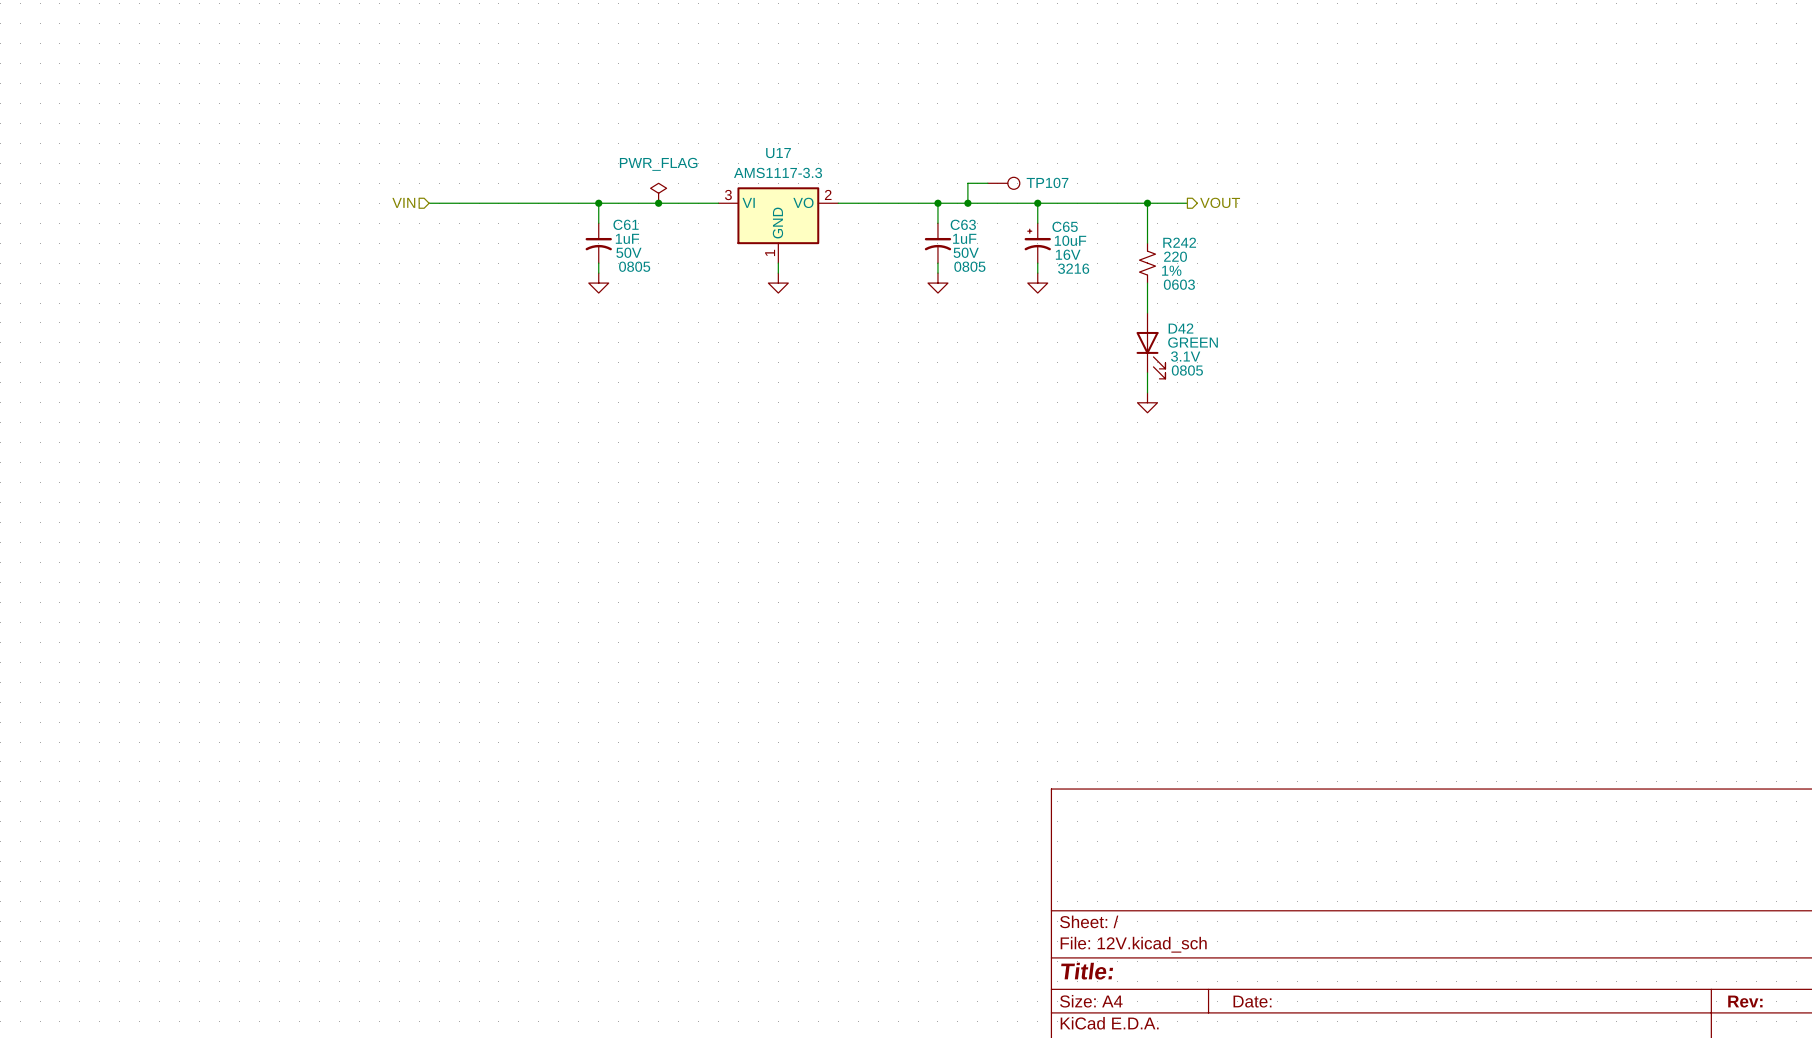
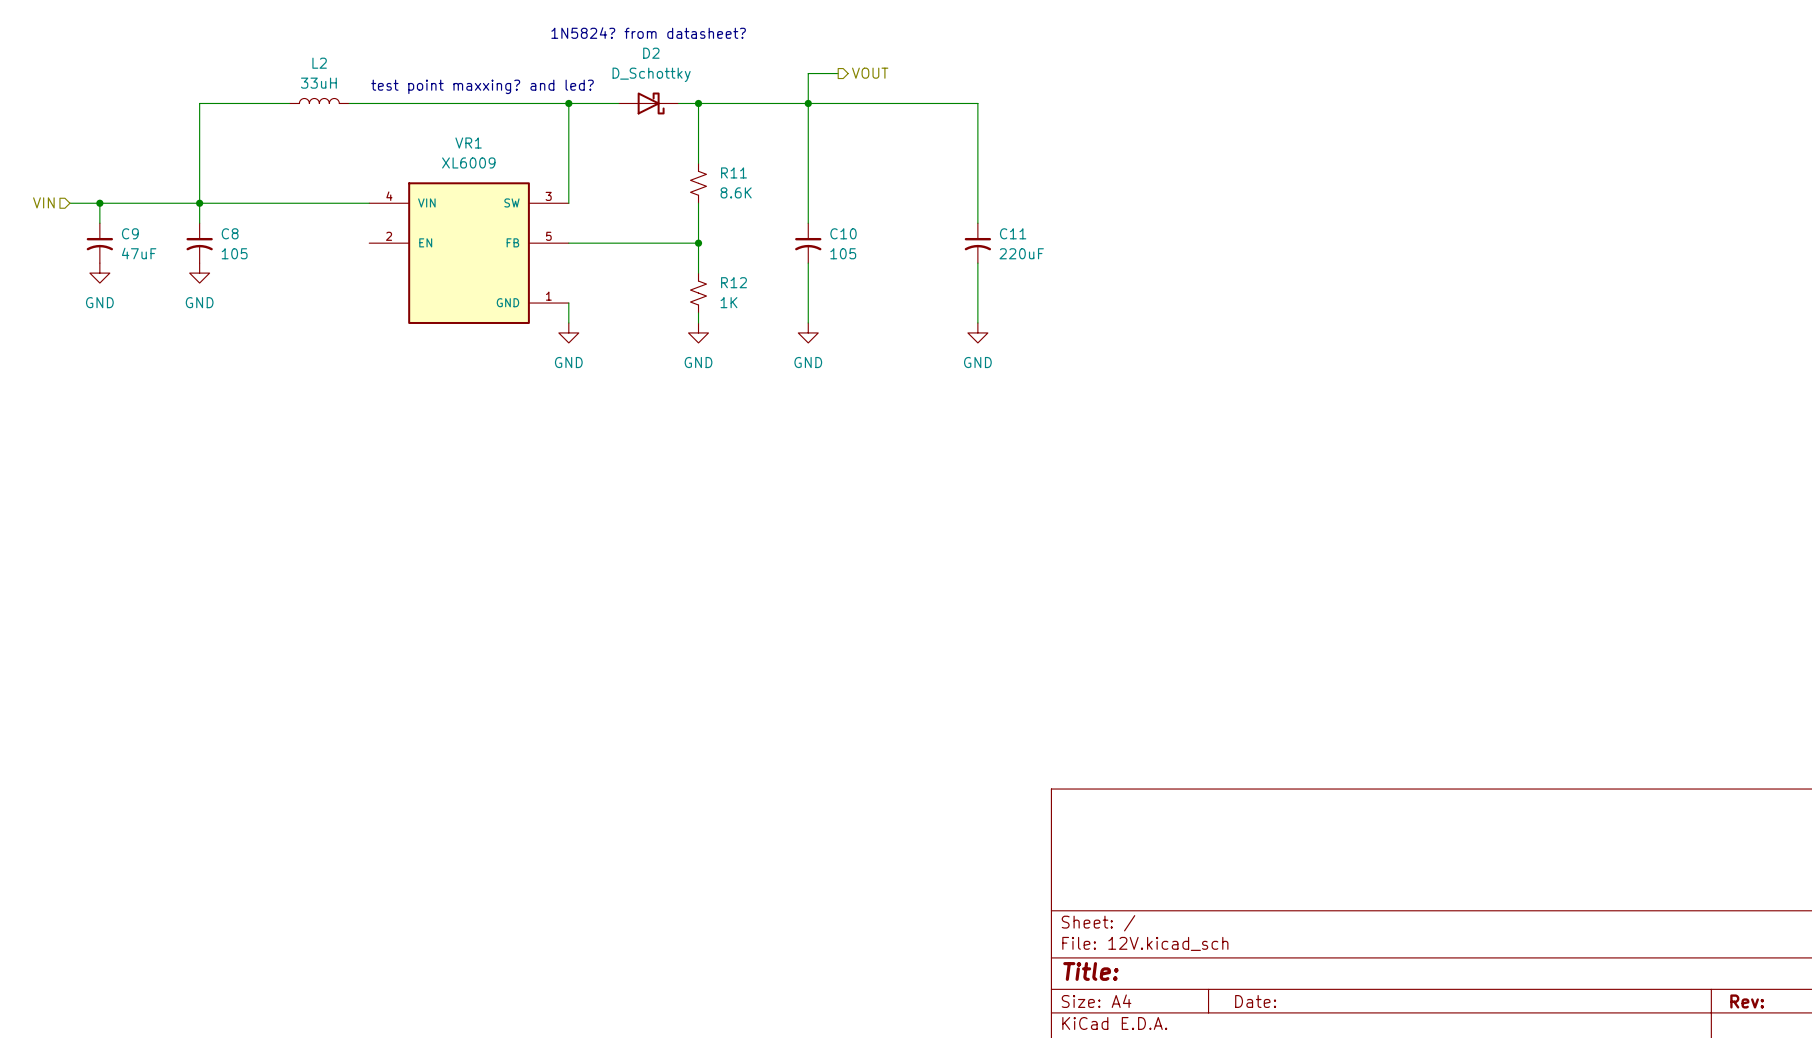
text: none -> 1N5824? from datasheet? (648, 33)
wire: none -> (838, 73) (808, 73) (808, 223)
hierarchical label: none -> VOUT (870, 73)
text: none -> test point maxxing? and led? (482, 86)
L2: none -> 33uH (319, 100)
wire: none -> (289, 103) (199, 103) (199, 223)
wire: none -> (349, 103) (618, 103)
wire: none -> (568, 103) (568, 203)
junction: none -> (568, 103)
D2: none -> D_Schottky (648, 103)
wire: none -> (678, 103) (977, 103) (977, 223)
wire: none -> (698, 103) (698, 163)
junction: none -> (698, 103)
junction: none -> (808, 103)
R11: none -> 8.6K (698, 183)
wire: (987, 183) (967, 183) (967, 203) -> none
TP107: (1003, 183) -> none
power symbol: PWR_FLAG (658, 193) -> none
hierarchical label: none -> VIN (43, 202)
hierarchical label: VIN (403, 202) -> none
hierarchical label: VOUT (1220, 202) -> none
wire: none -> (69, 203) (369, 203)
wire: none -> (99, 203) (99, 223)
junction: none -> (99, 203)
junction: none -> (199, 203)
wire: (429, 203) (718, 203) -> none
wire: (598, 203) (598, 223) -> (568, 303) (568, 322)
junction: (598, 203) -> none
junction: (658, 203) -> none
wire: none -> (698, 203) (698, 273)
wire: (838, 203) (1187, 203) -> none
wire: (937, 203) (937, 223) -> none
junction: (937, 203) -> none
junction: (967, 203) -> none
wire: (1037, 203) (1037, 223) -> none
junction: (1037, 203) -> none
wire: (1147, 203) (1147, 243) -> none
junction: (1147, 203) -> none
U17: AMS1117-3.3 (778, 225) -> none
C9: none -> 47uF (99, 243)
C8: none -> 105 (199, 243)
wire: none -> (568, 243) (698, 243)
C61: 1uF (598, 243) -> none
junction: none -> (698, 243)
C10: none -> 105 (808, 243)
C63: 1uF (937, 243) -> none
C11: none -> 220uF (977, 243)
C65: 10uF (1037, 243) -> none
VR1: none -> XL6009 (469, 253)
wire: (598, 263) (598, 273) -> none
wire: (778, 263) (778, 273) -> (698, 313) (698, 322)
wire: none -> (808, 263) (808, 322)
wire: (937, 263) (937, 273) -> none
wire: none -> (977, 263) (977, 322)
wire: (1037, 263) (1037, 273) -> none
R242: 220 (1147, 263) -> none
power symbol: none -> GND (99, 273)
power symbol: none -> GND (199, 273)
power symbol: (598, 283) -> none
power symbol: (778, 283) -> none
power symbol: (937, 283) -> none
power symbol: (1037, 283) -> none
wire: (1147, 283) (1147, 313) -> none
R12: none -> 1K (698, 293)
power symbol: none -> GND (568, 332)
power symbol: none -> GND (698, 332)
power symbol: none -> GND (808, 332)
power symbol: none -> GND (977, 332)
D42: GREEN (1150, 345) -> none
wire: (1147, 372) (1147, 392) -> none
power symbol: (1147, 402) -> none

